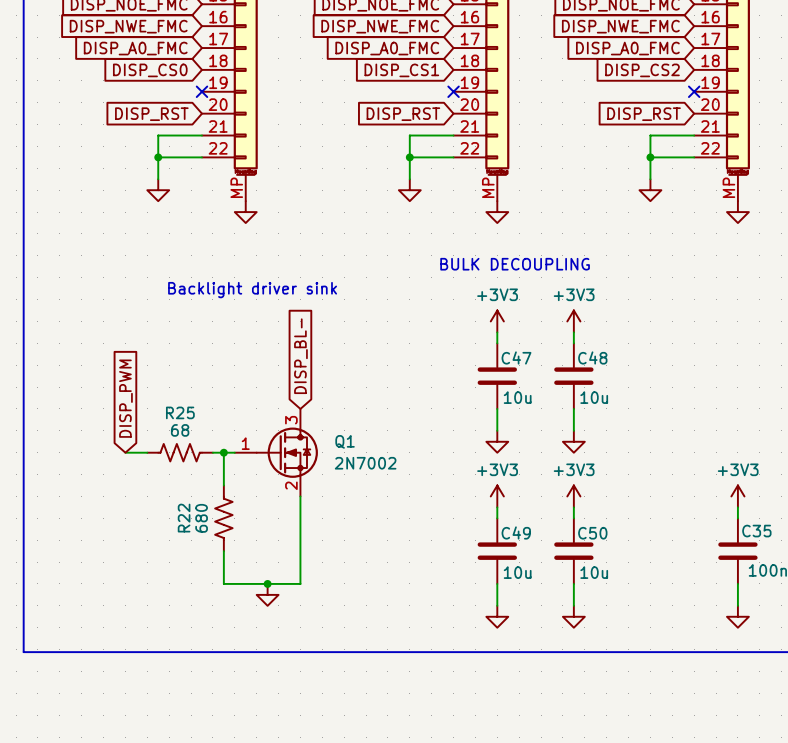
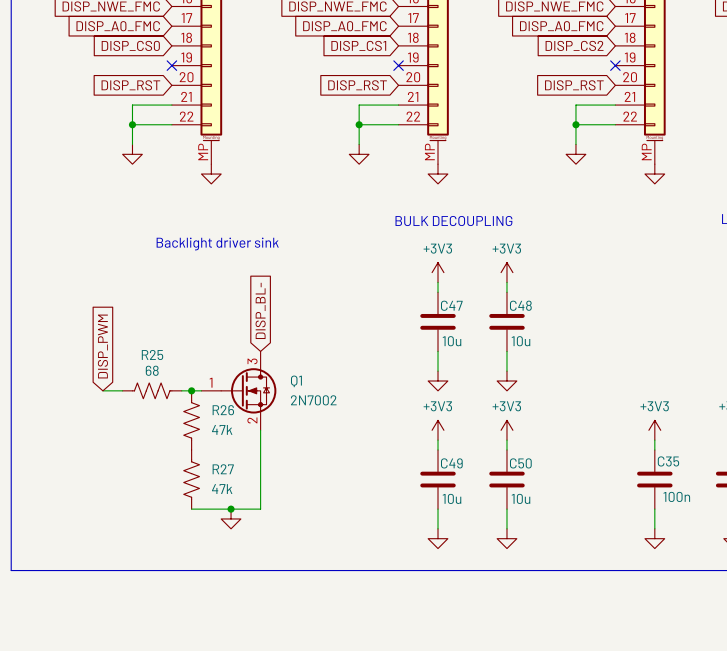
R26: none -> 47k (191, 420)
R22: 680 (223, 518) -> none
R27: none -> 47k (191, 479)

